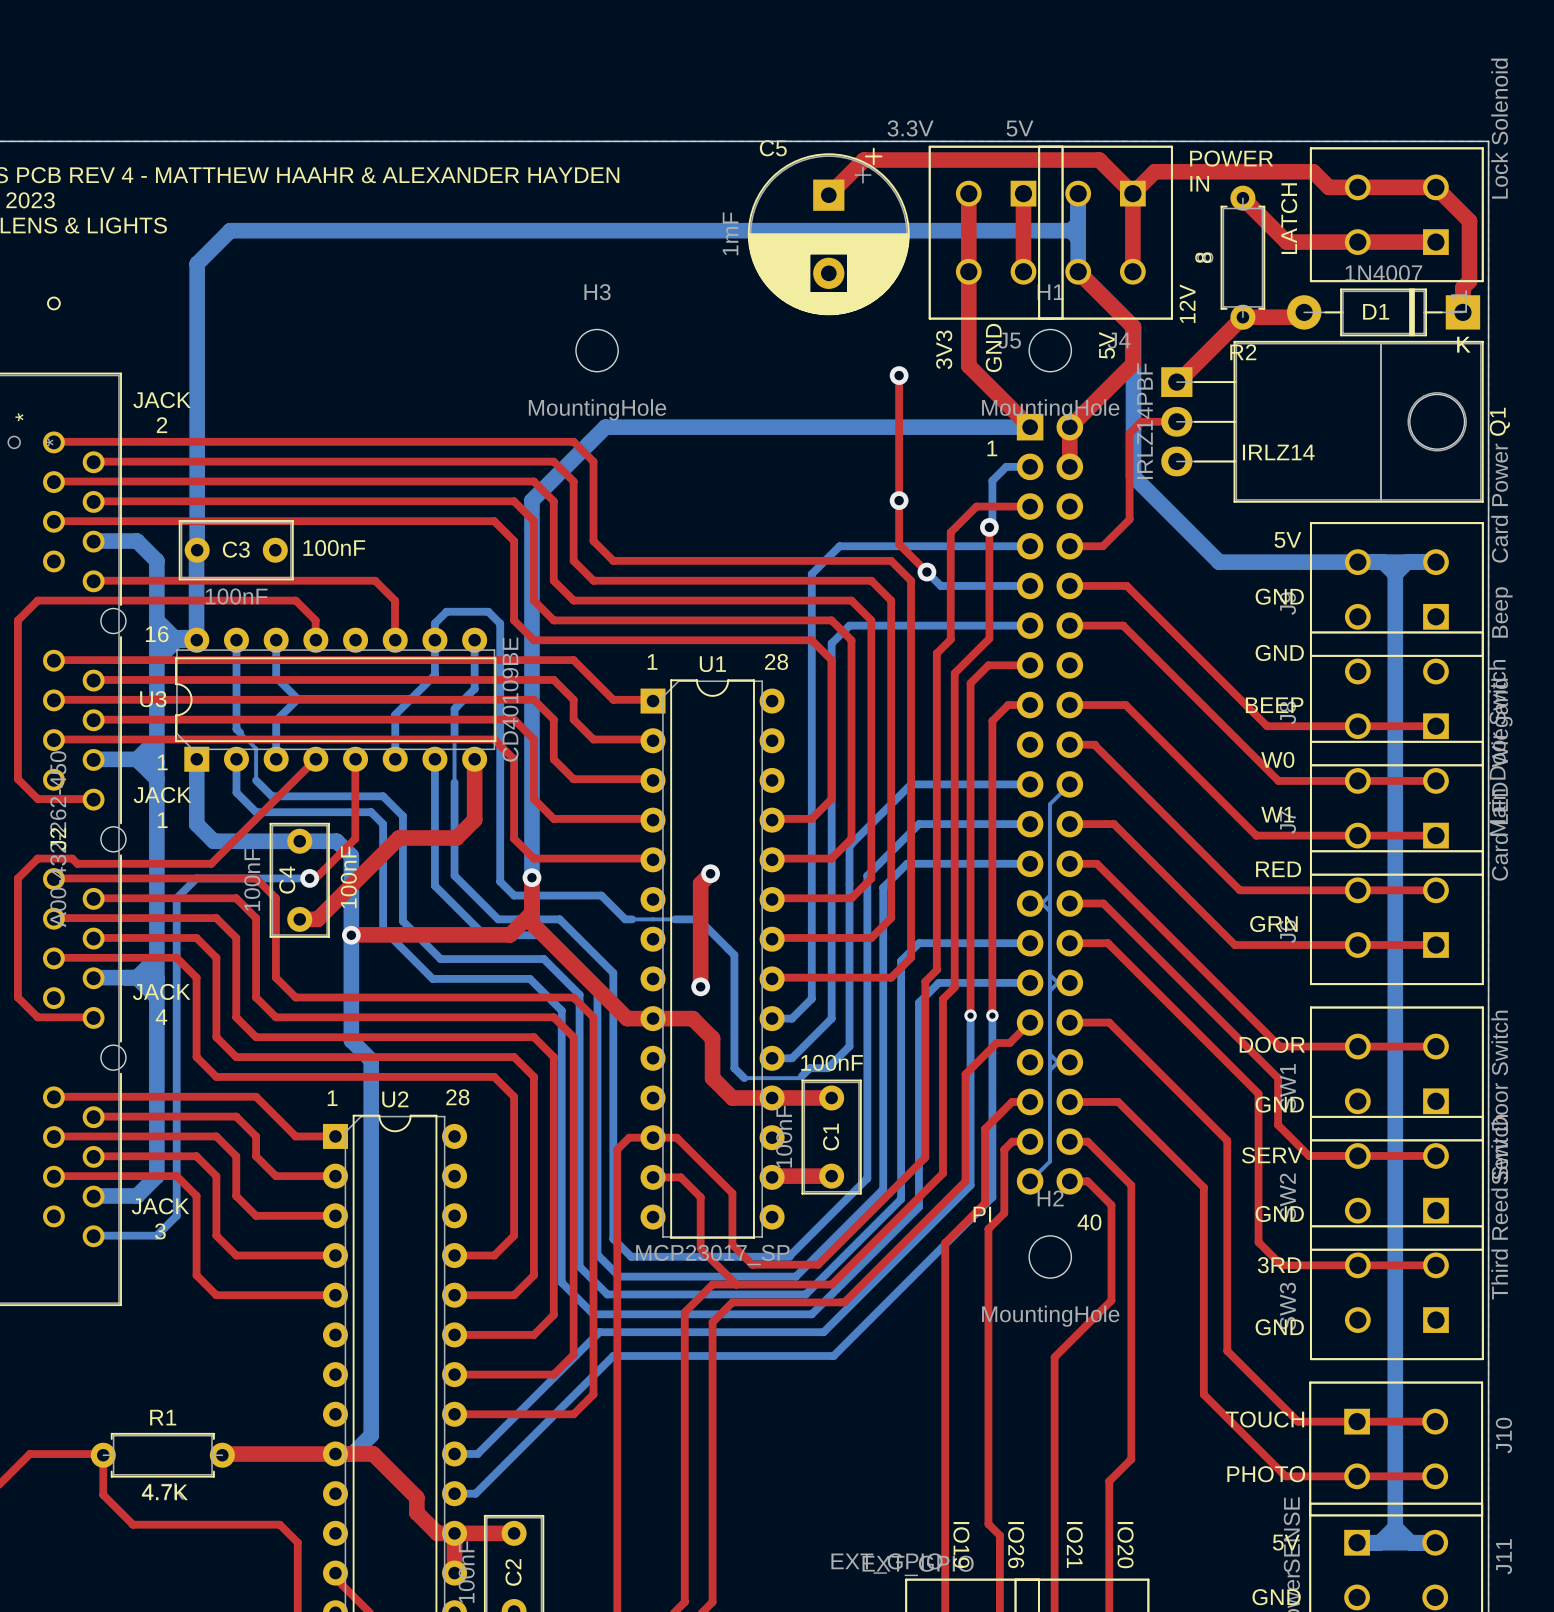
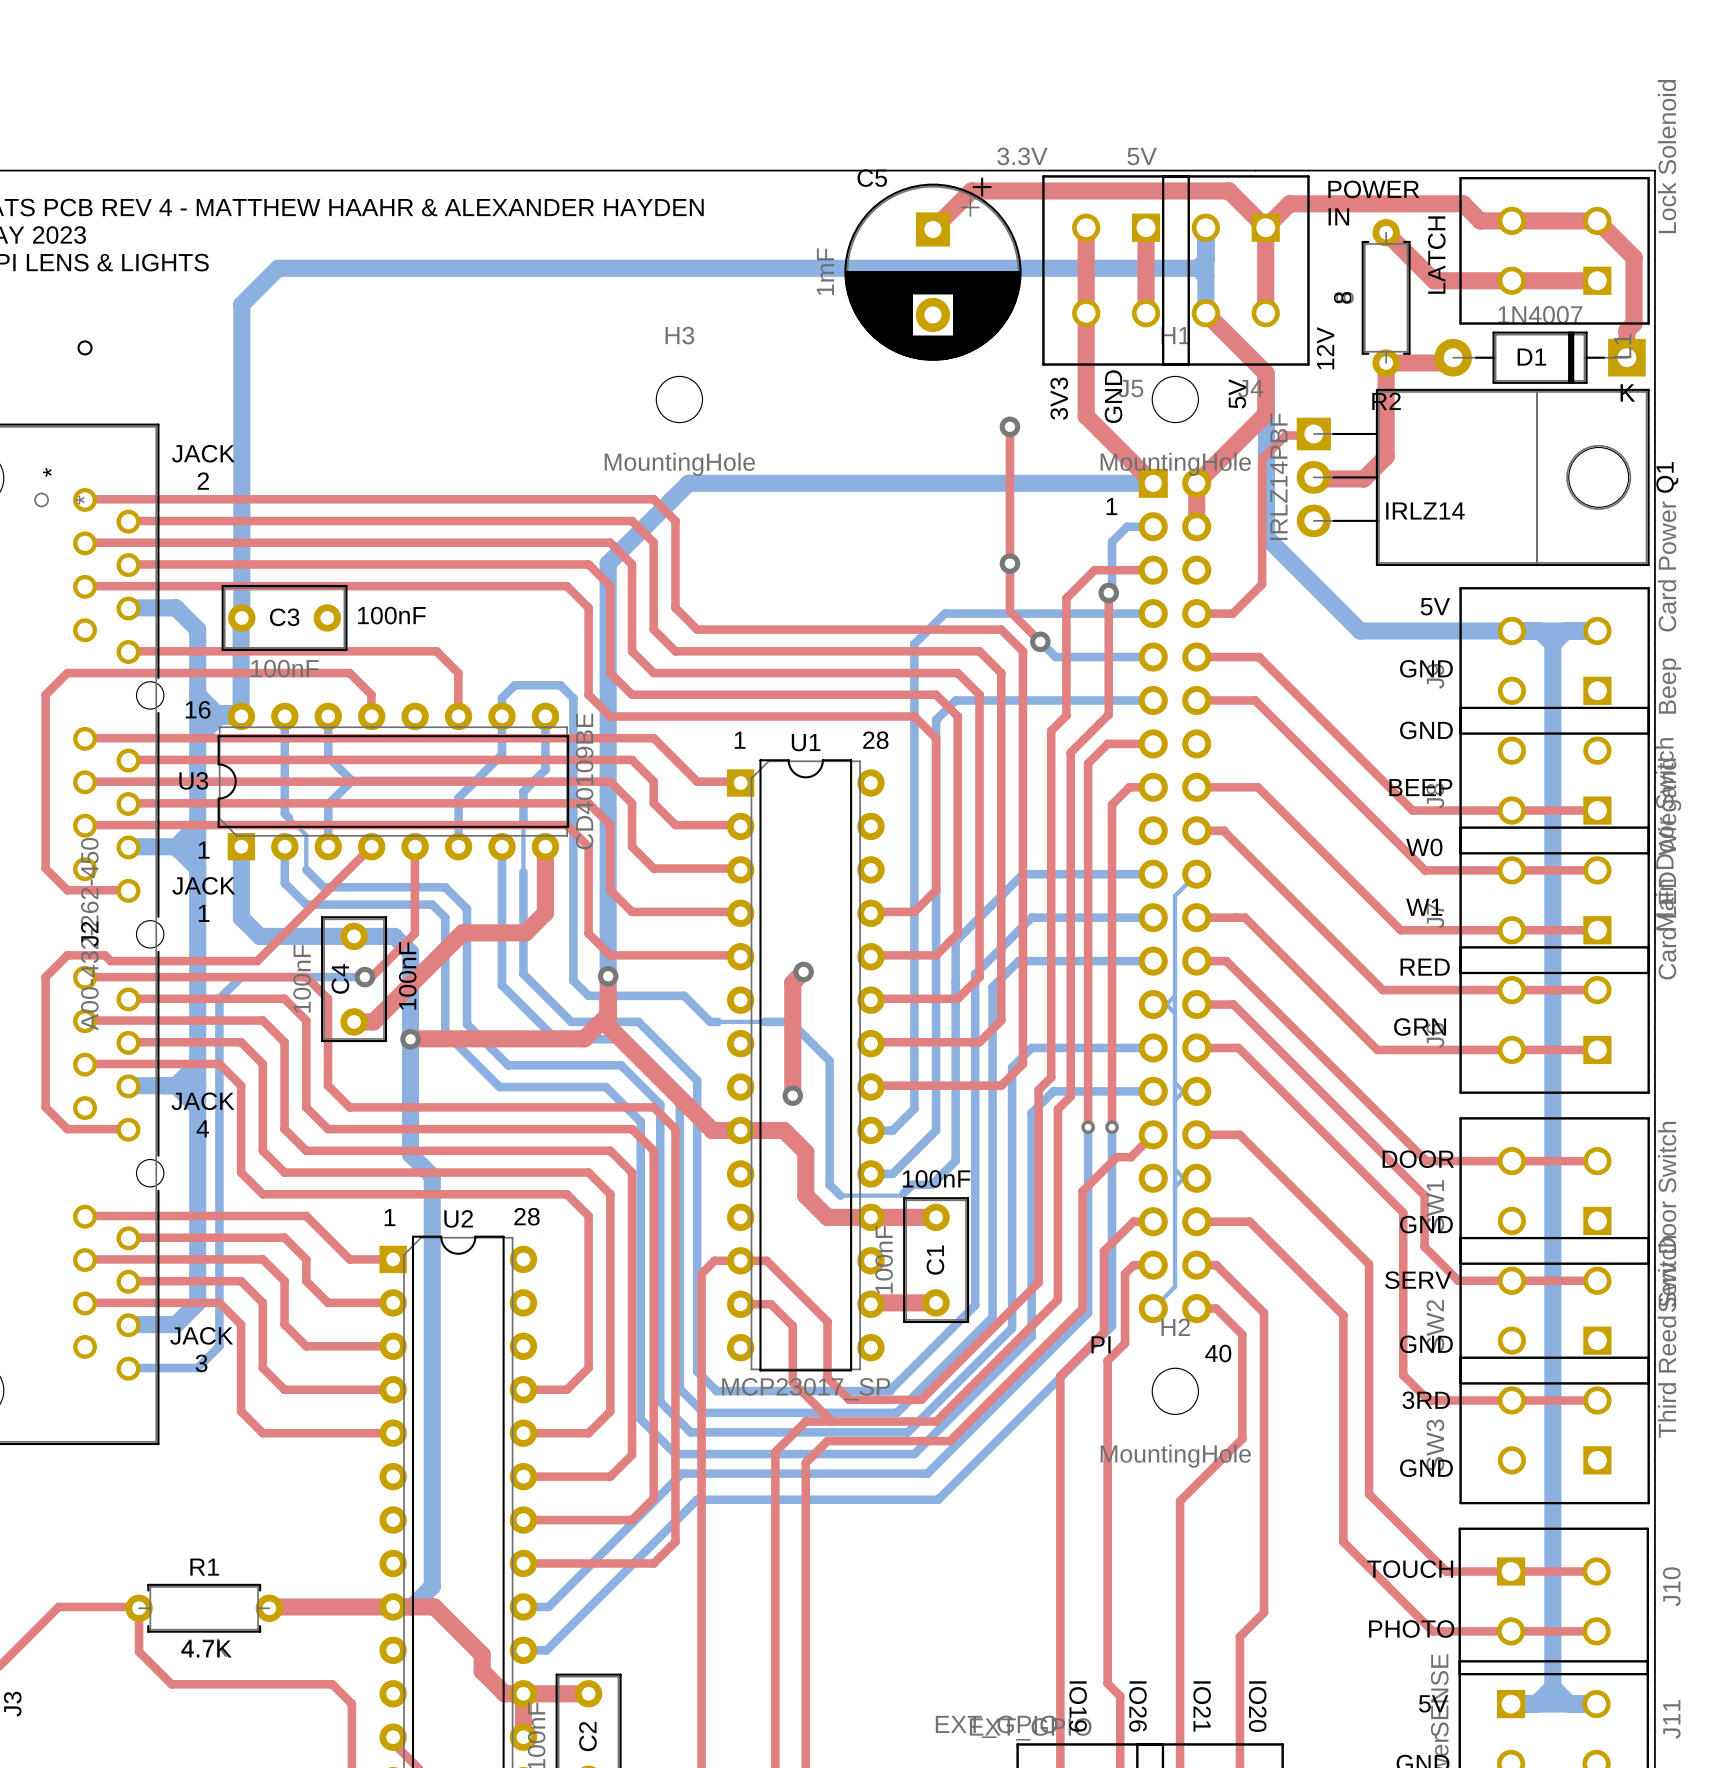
top track: (1242, 317) (1176, 382) -> (1386, 363) (1386, 456) (1363, 478) (1311, 478)
top track: (1176, 421) (1141, 421) (1129, 433) -> (1311, 435) (1285, 435) (1262, 459) (1262, 490)

